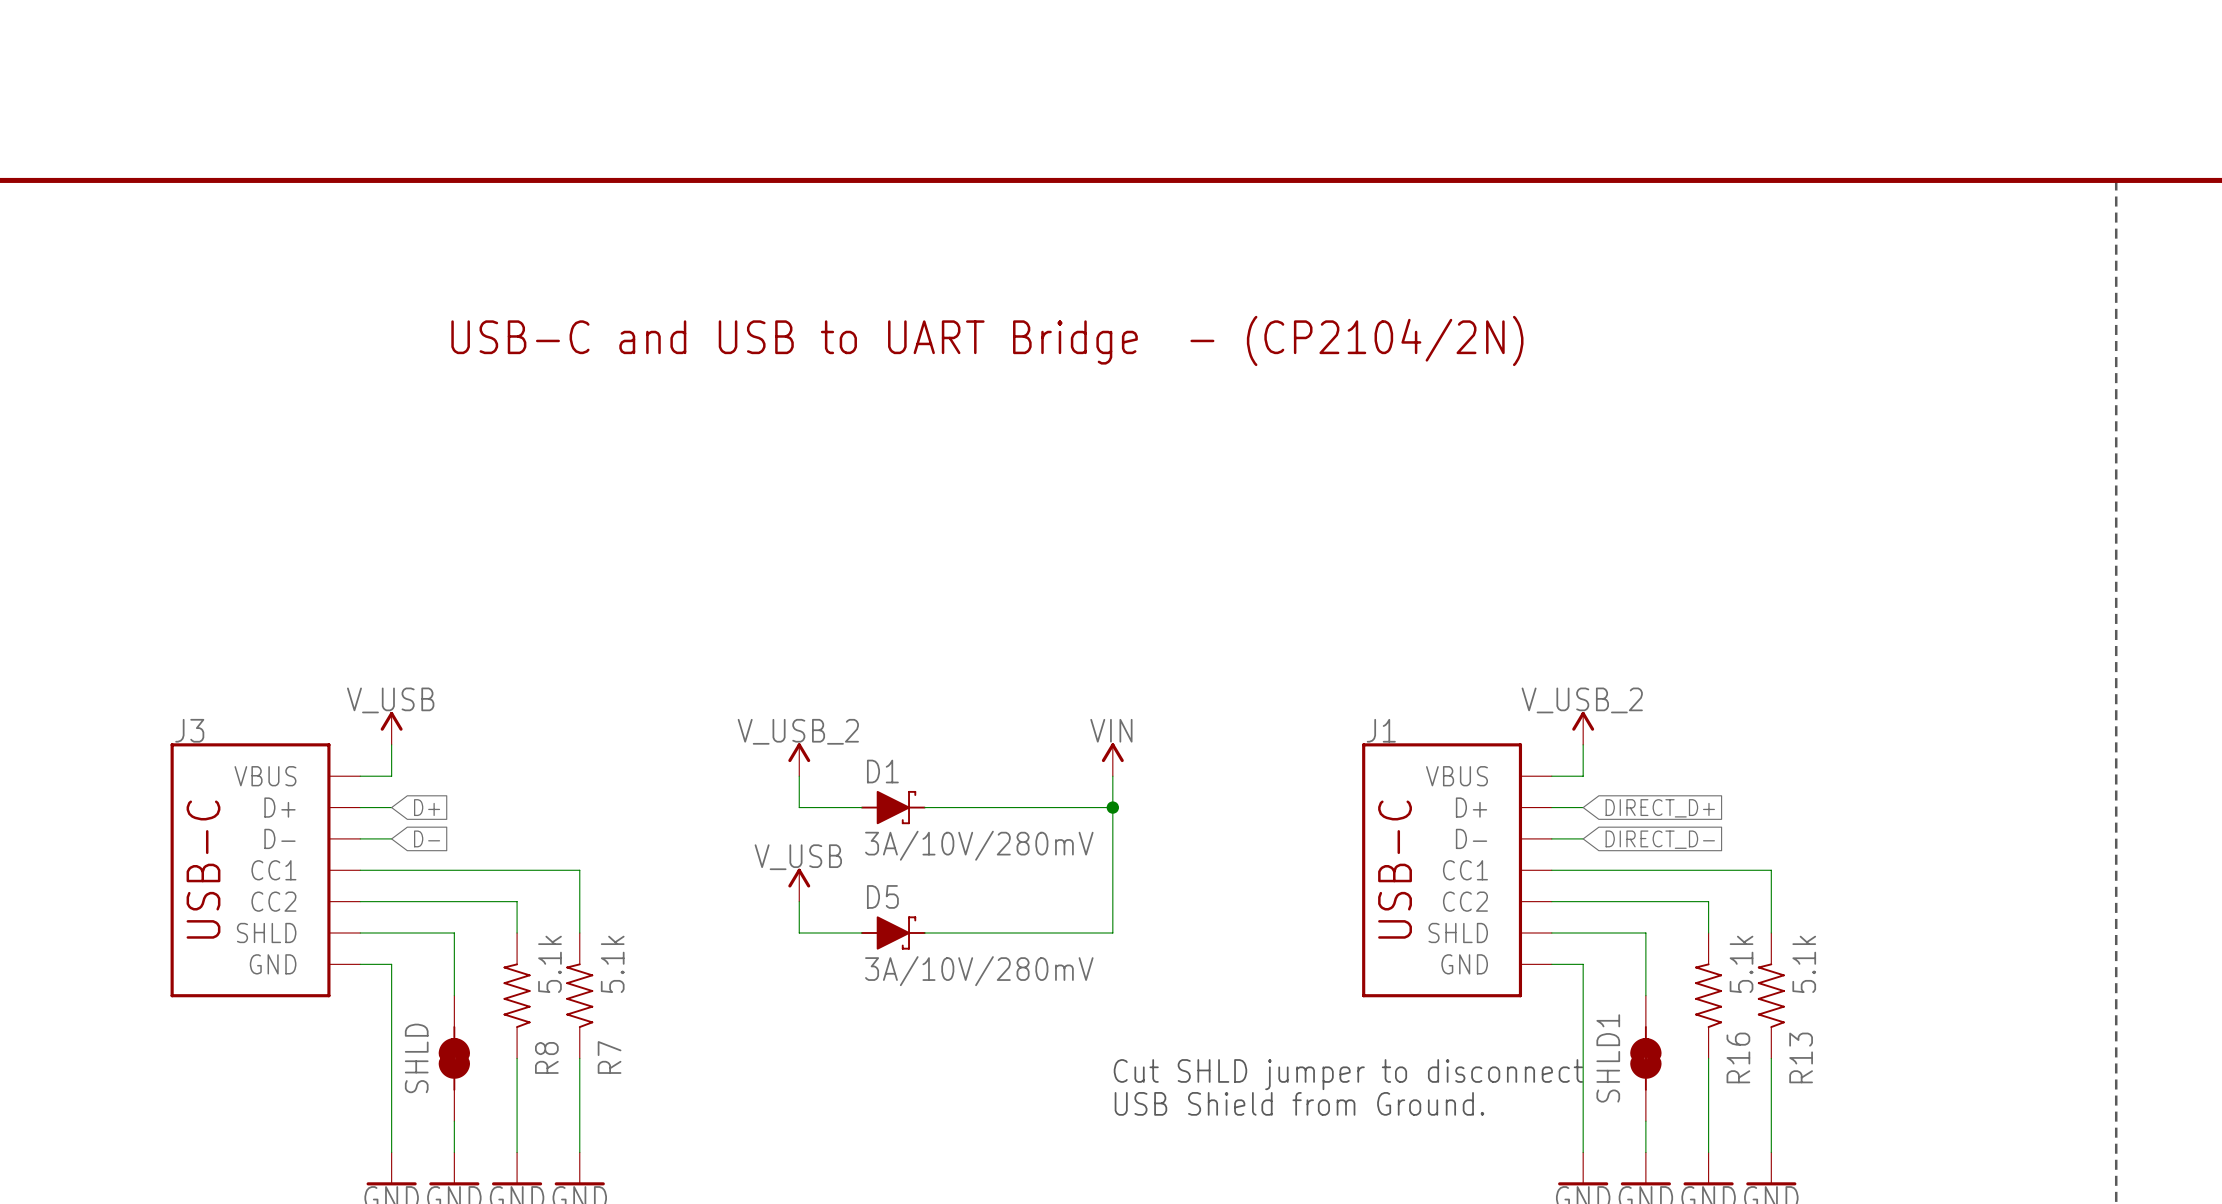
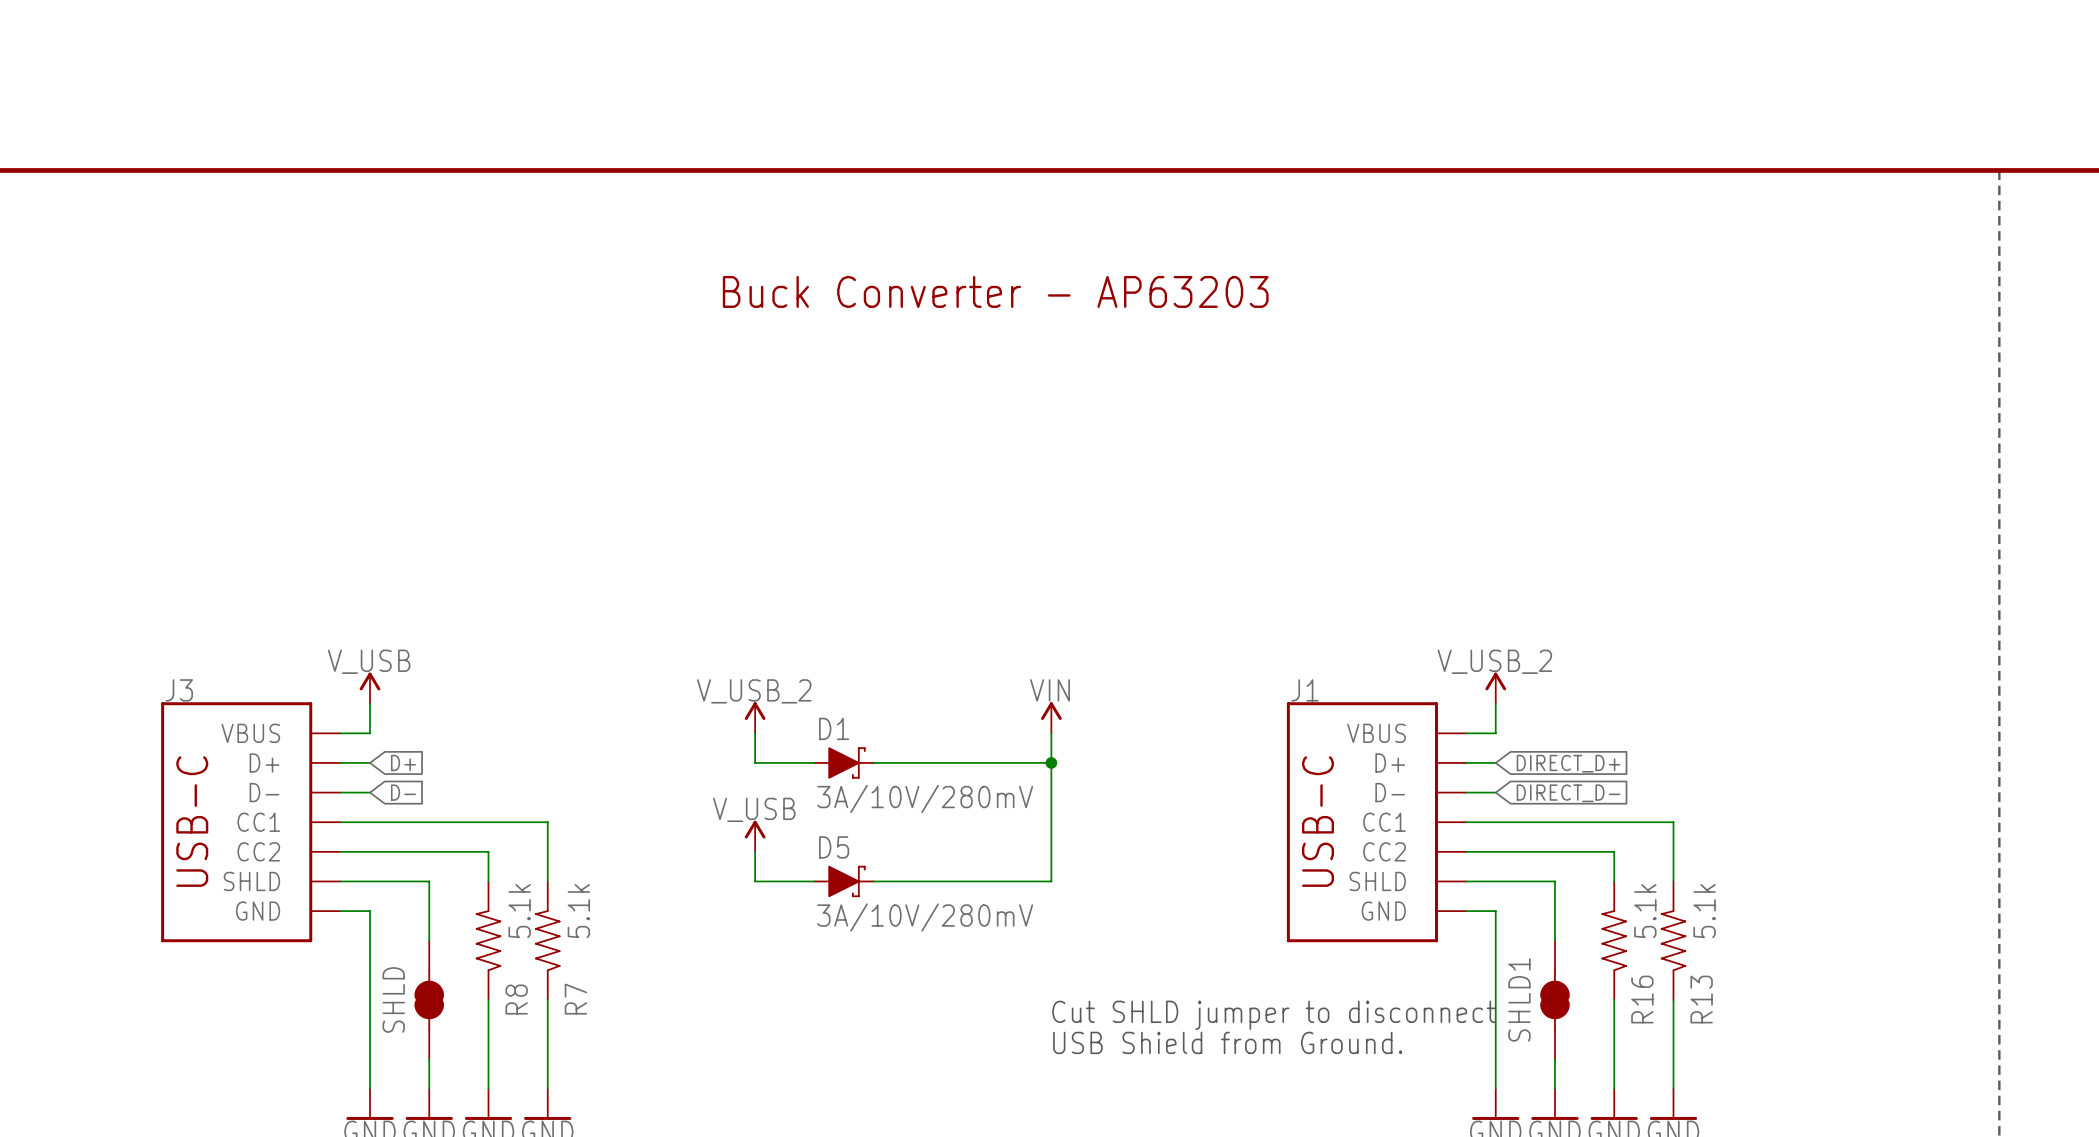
text: none -> Buck Converter - AP63203 (995, 291)
text: USB-C and USB to UART Bridge - (CP2104/2N) (987, 340) -> none

